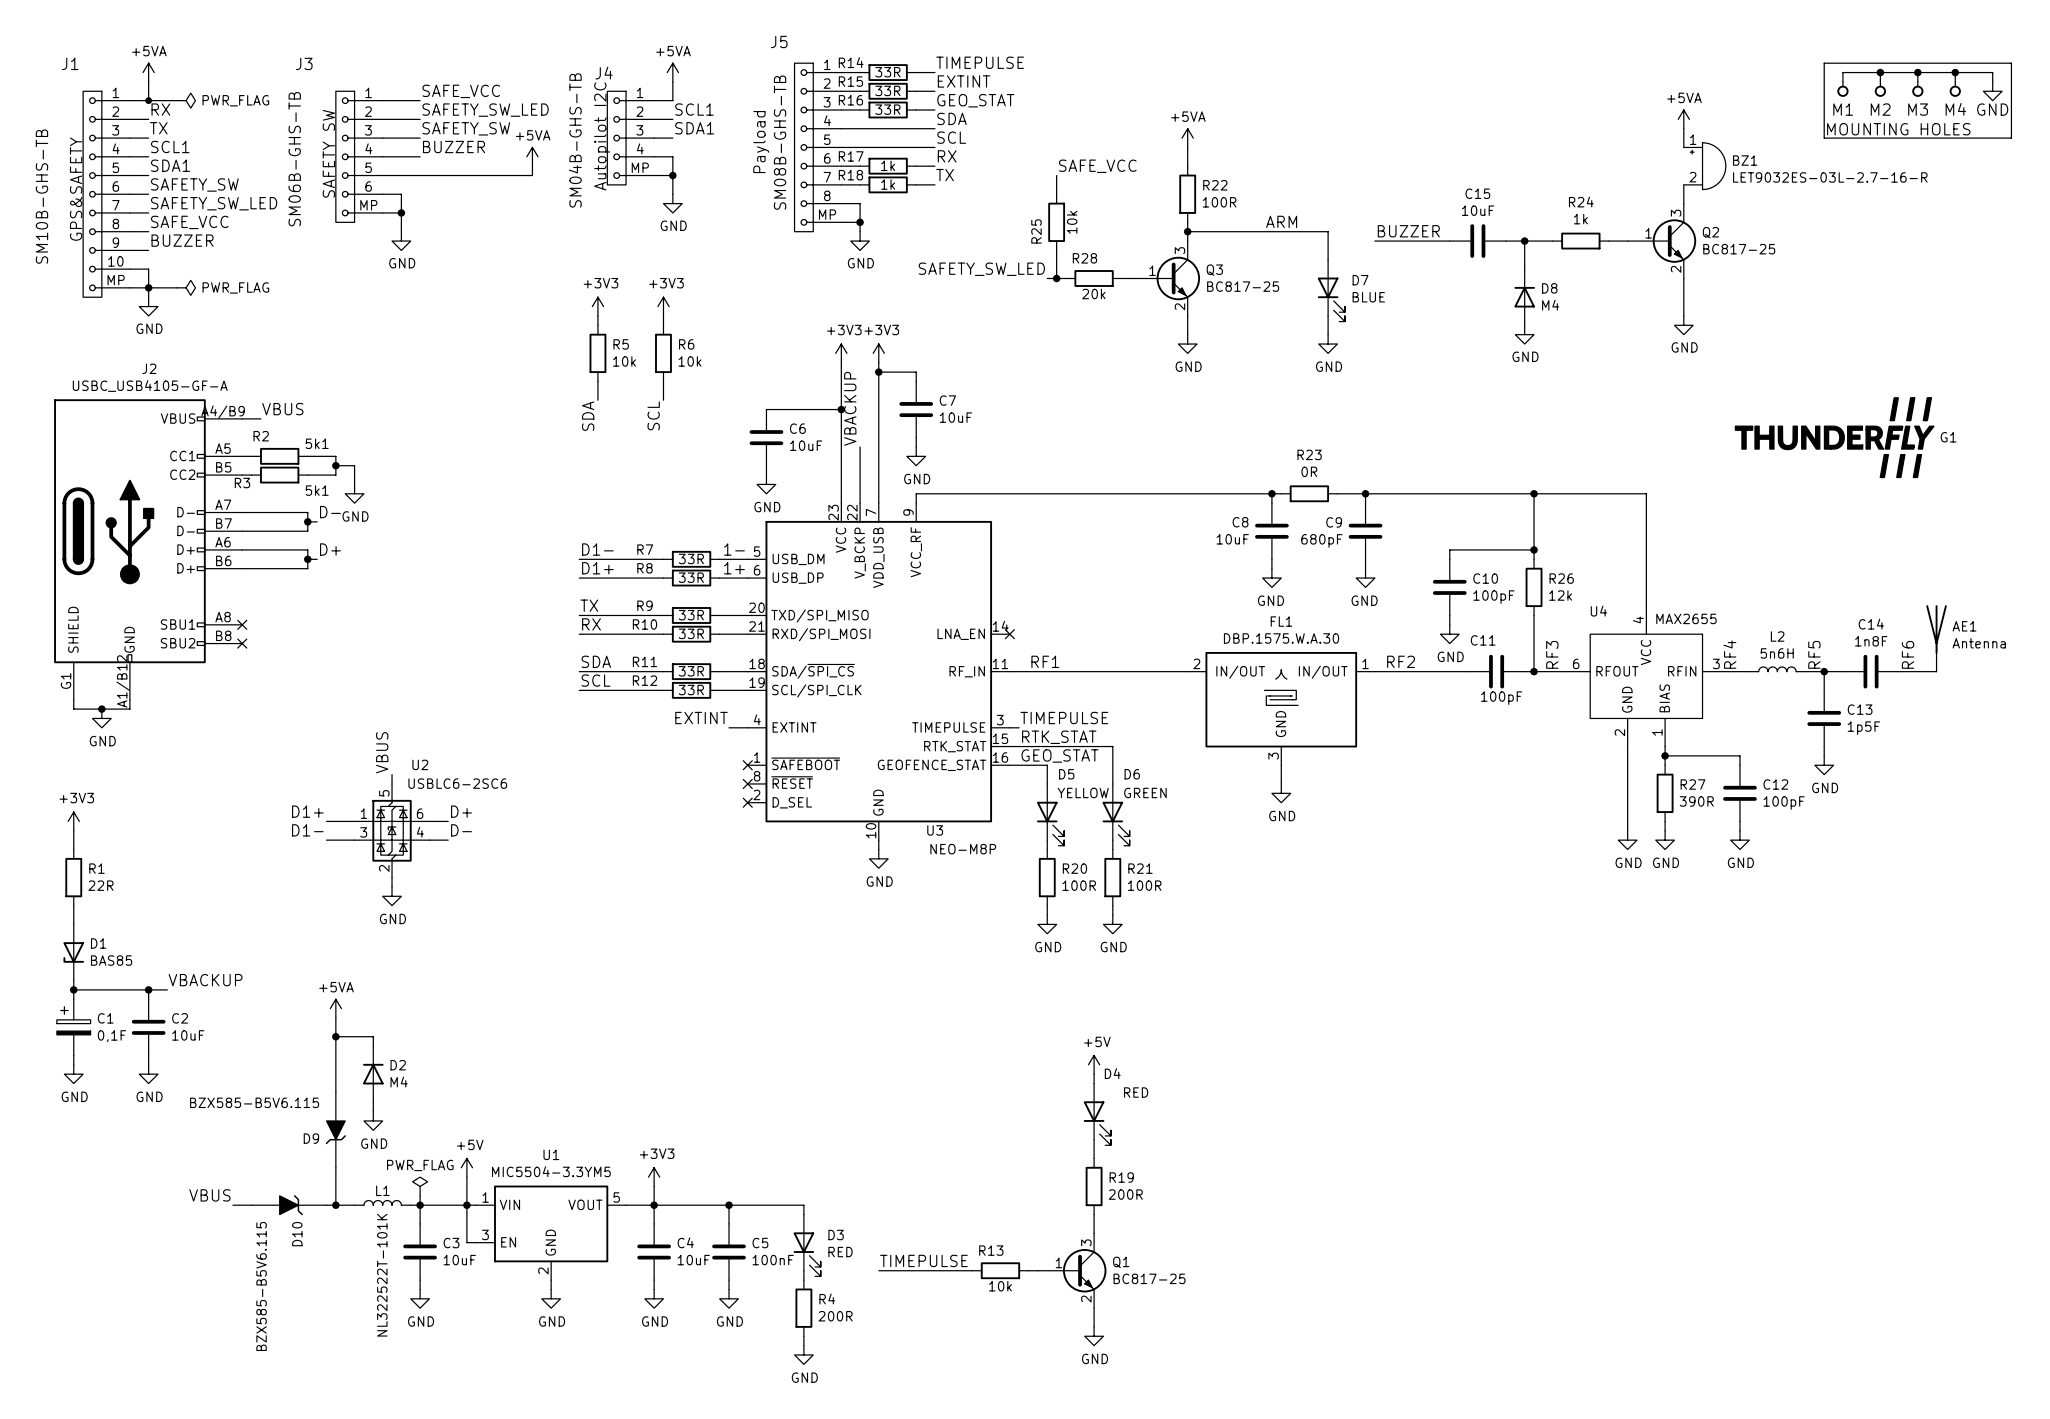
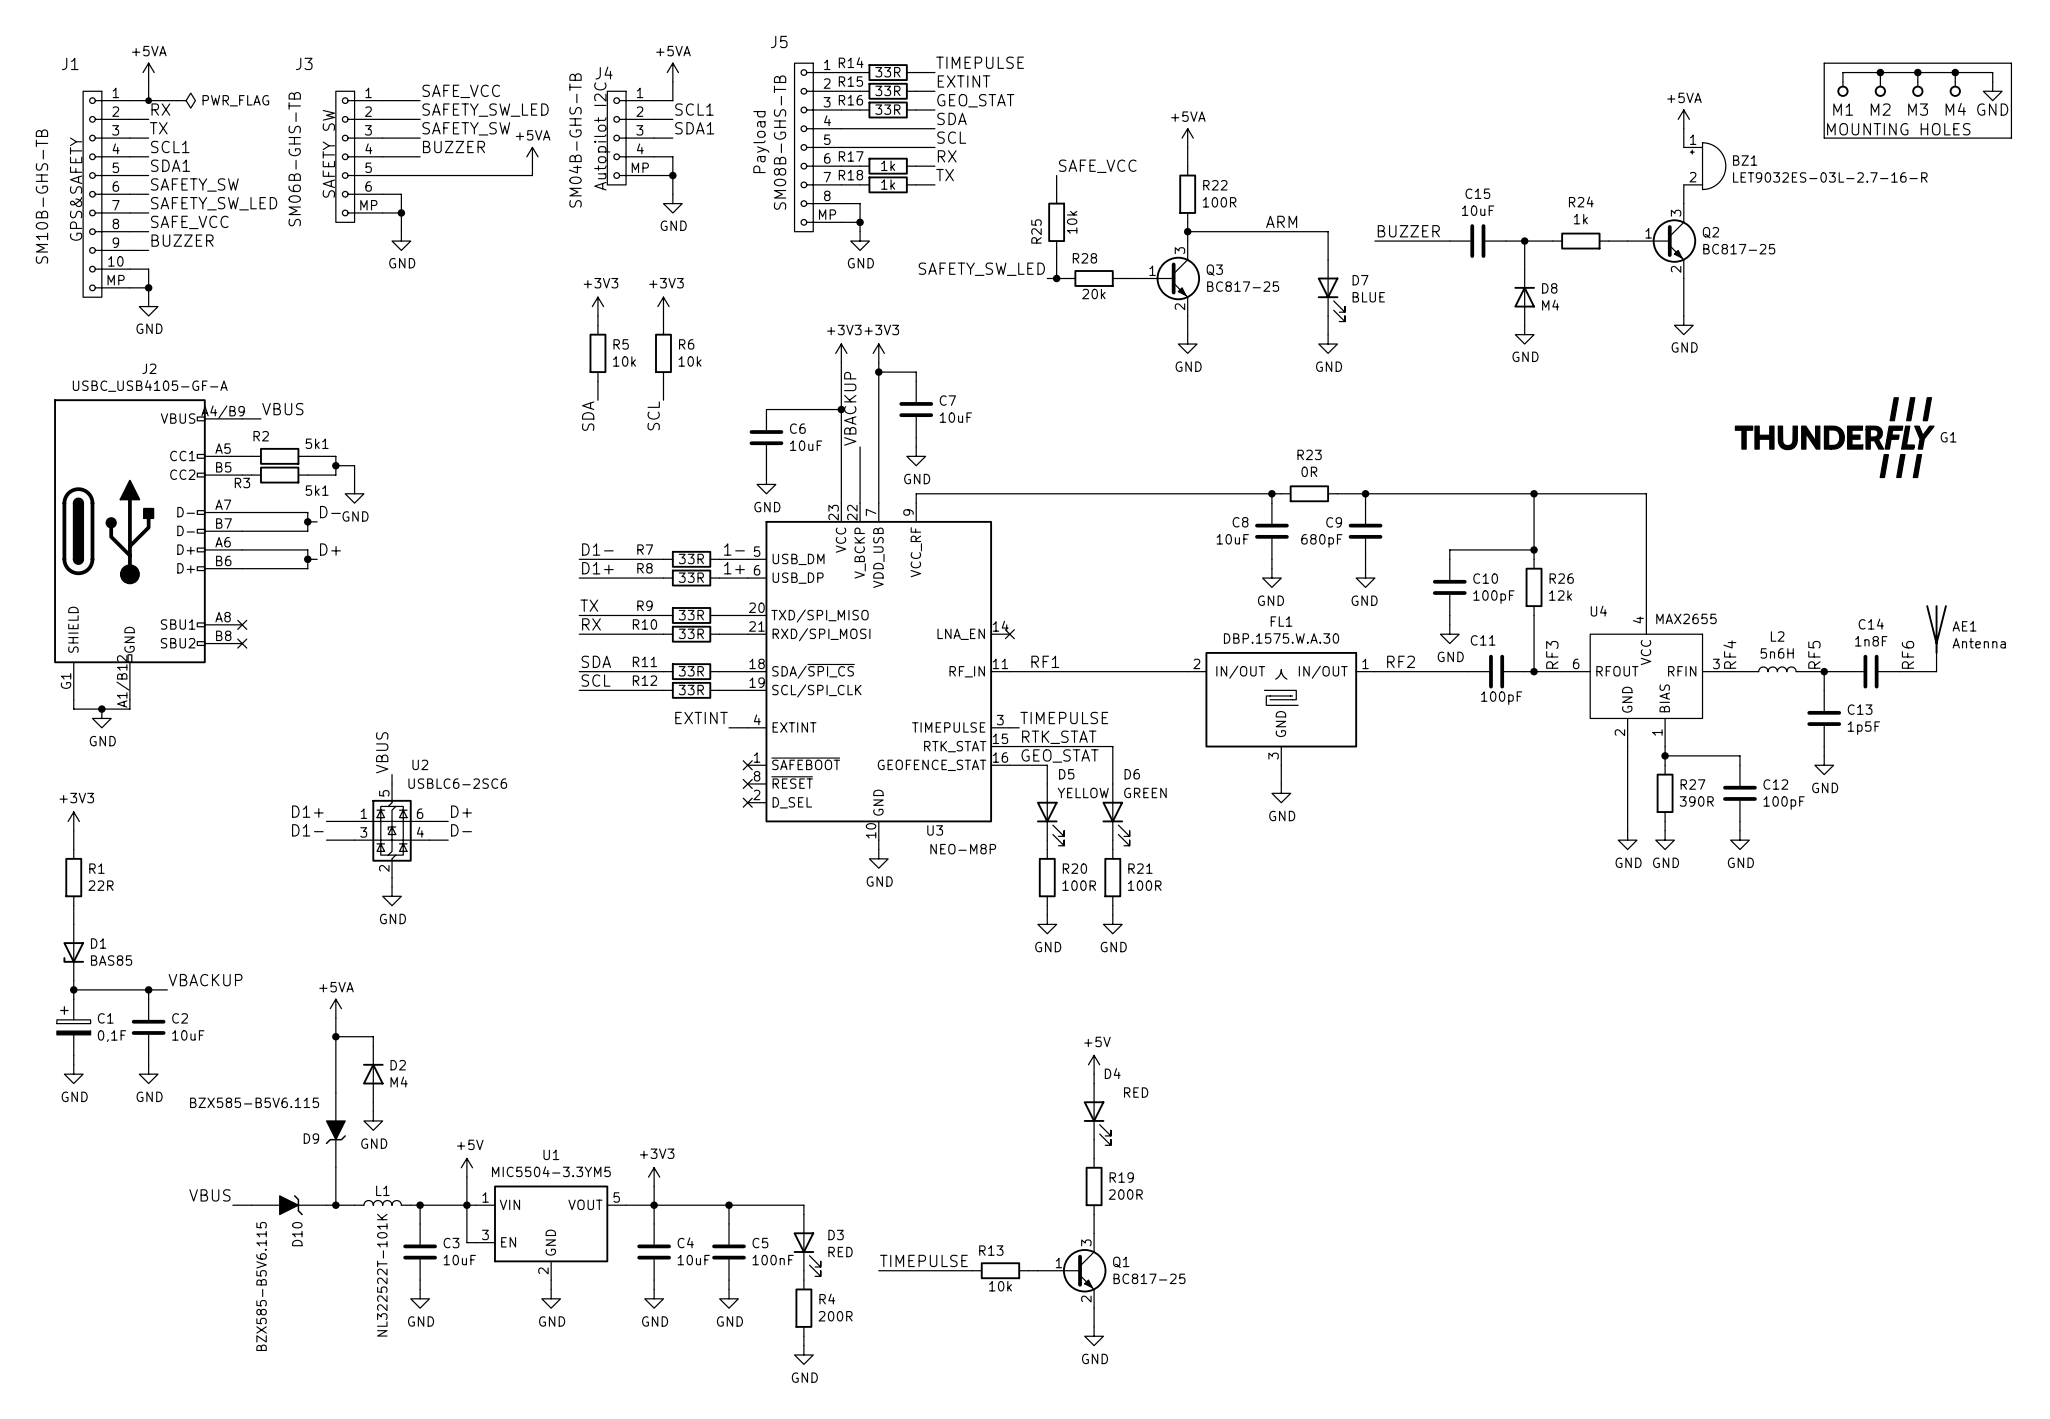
wire: (148, 287) (176, 287) -> none
power symbol: PWR_FLAG (186, 287) -> none
power symbol: PWR_FLAG (420, 1186) -> none
wire: (420, 1195) (420, 1205) -> none

